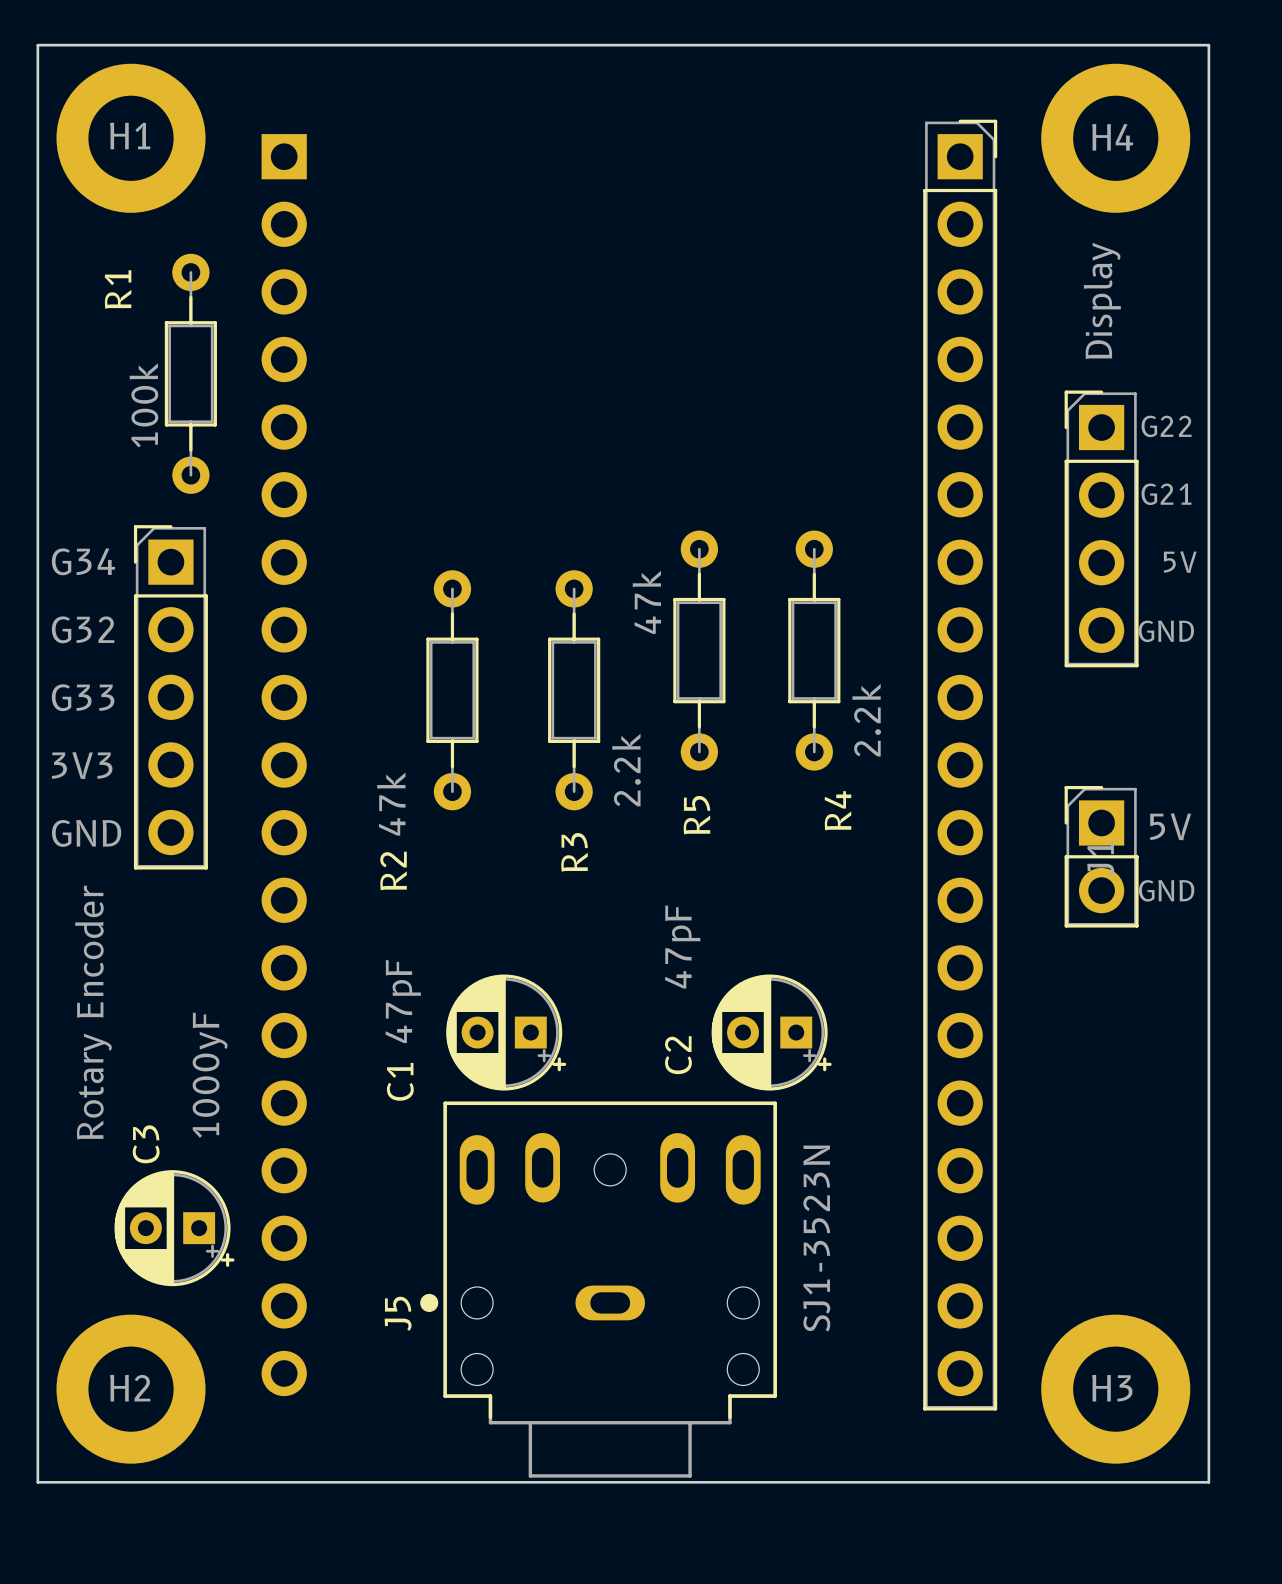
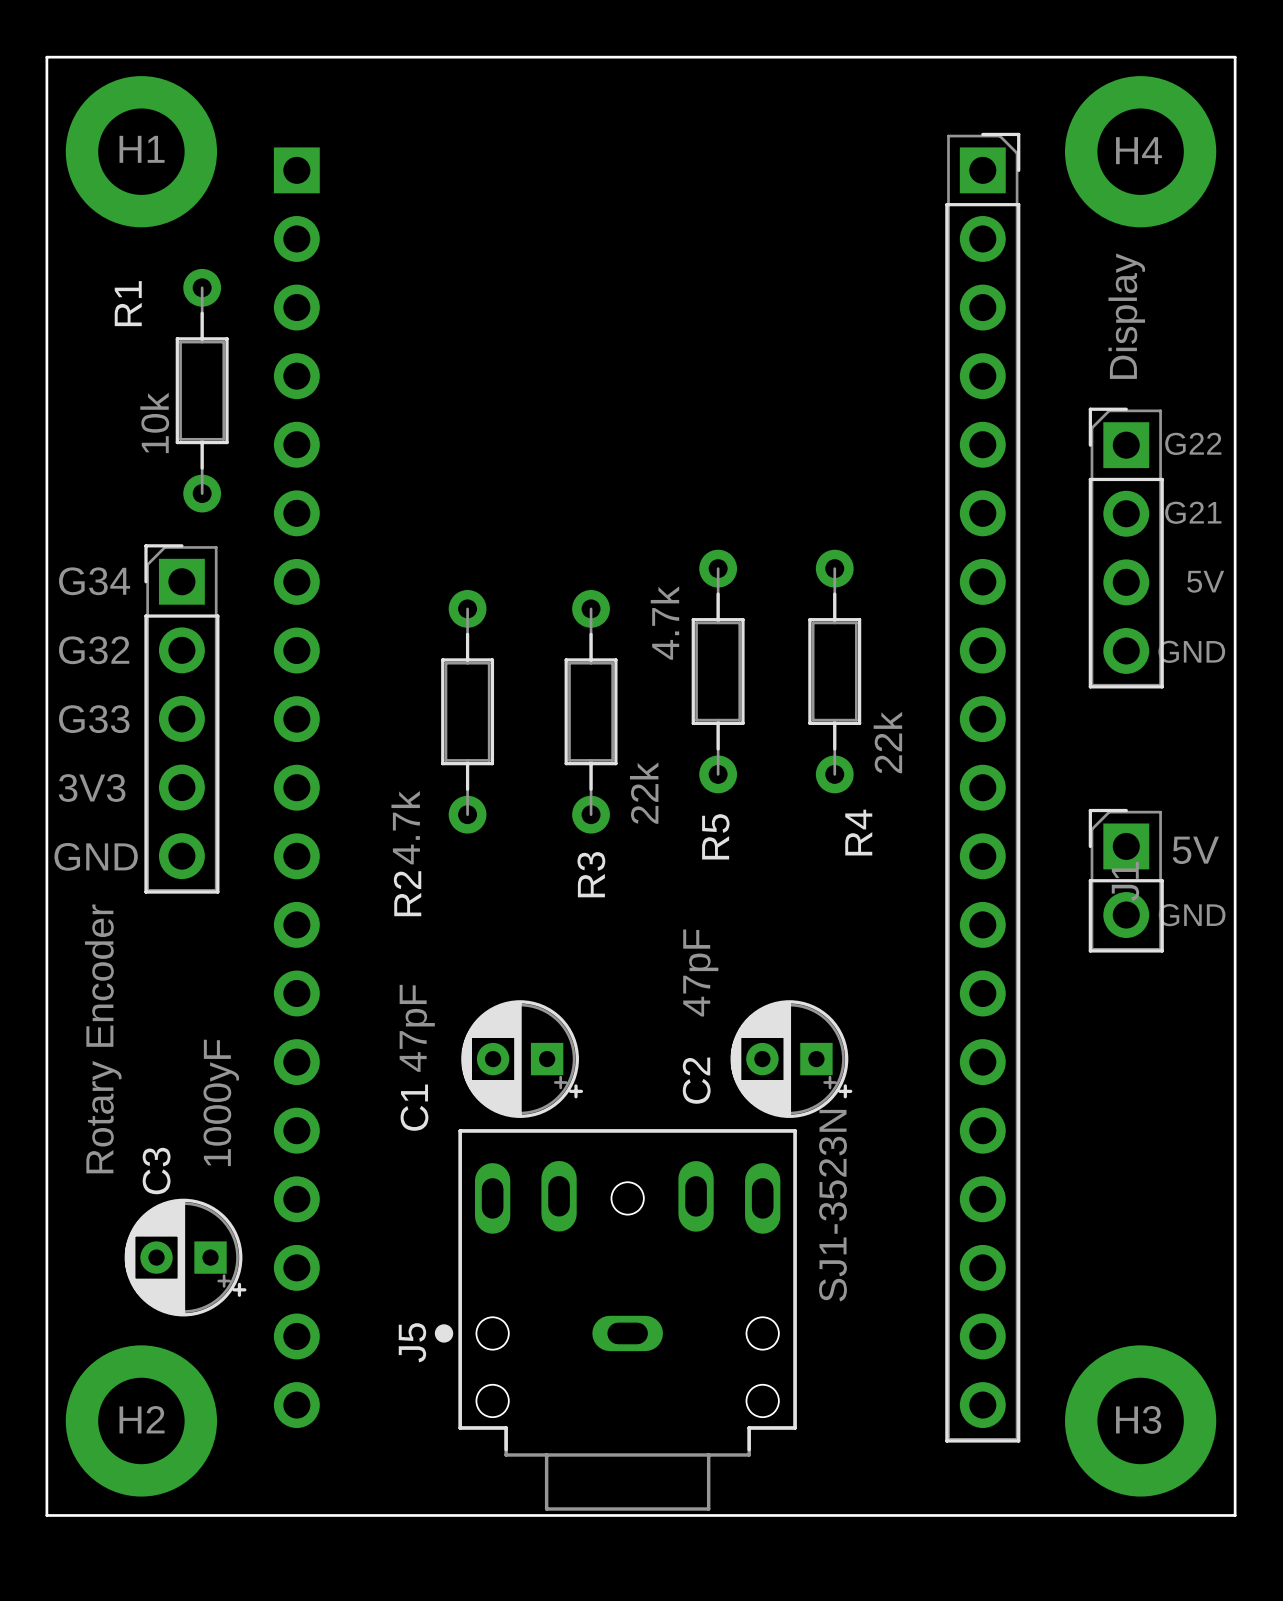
R1 value: 100k (143, 405) -> 10k (154, 422)
R5 value: 47k (646, 602) -> 4.7k (664, 623)
R4 value: 2.2k (866, 720) -> 22k (887, 742)
R3 value: 2.2k (626, 770) -> 22k (644, 793)
R2 value: 47k (391, 804) -> 4.7k (405, 827)
J5 value position: SJ1-3523N (816, 1238) -> SJ1-3523N (832, 1205)

